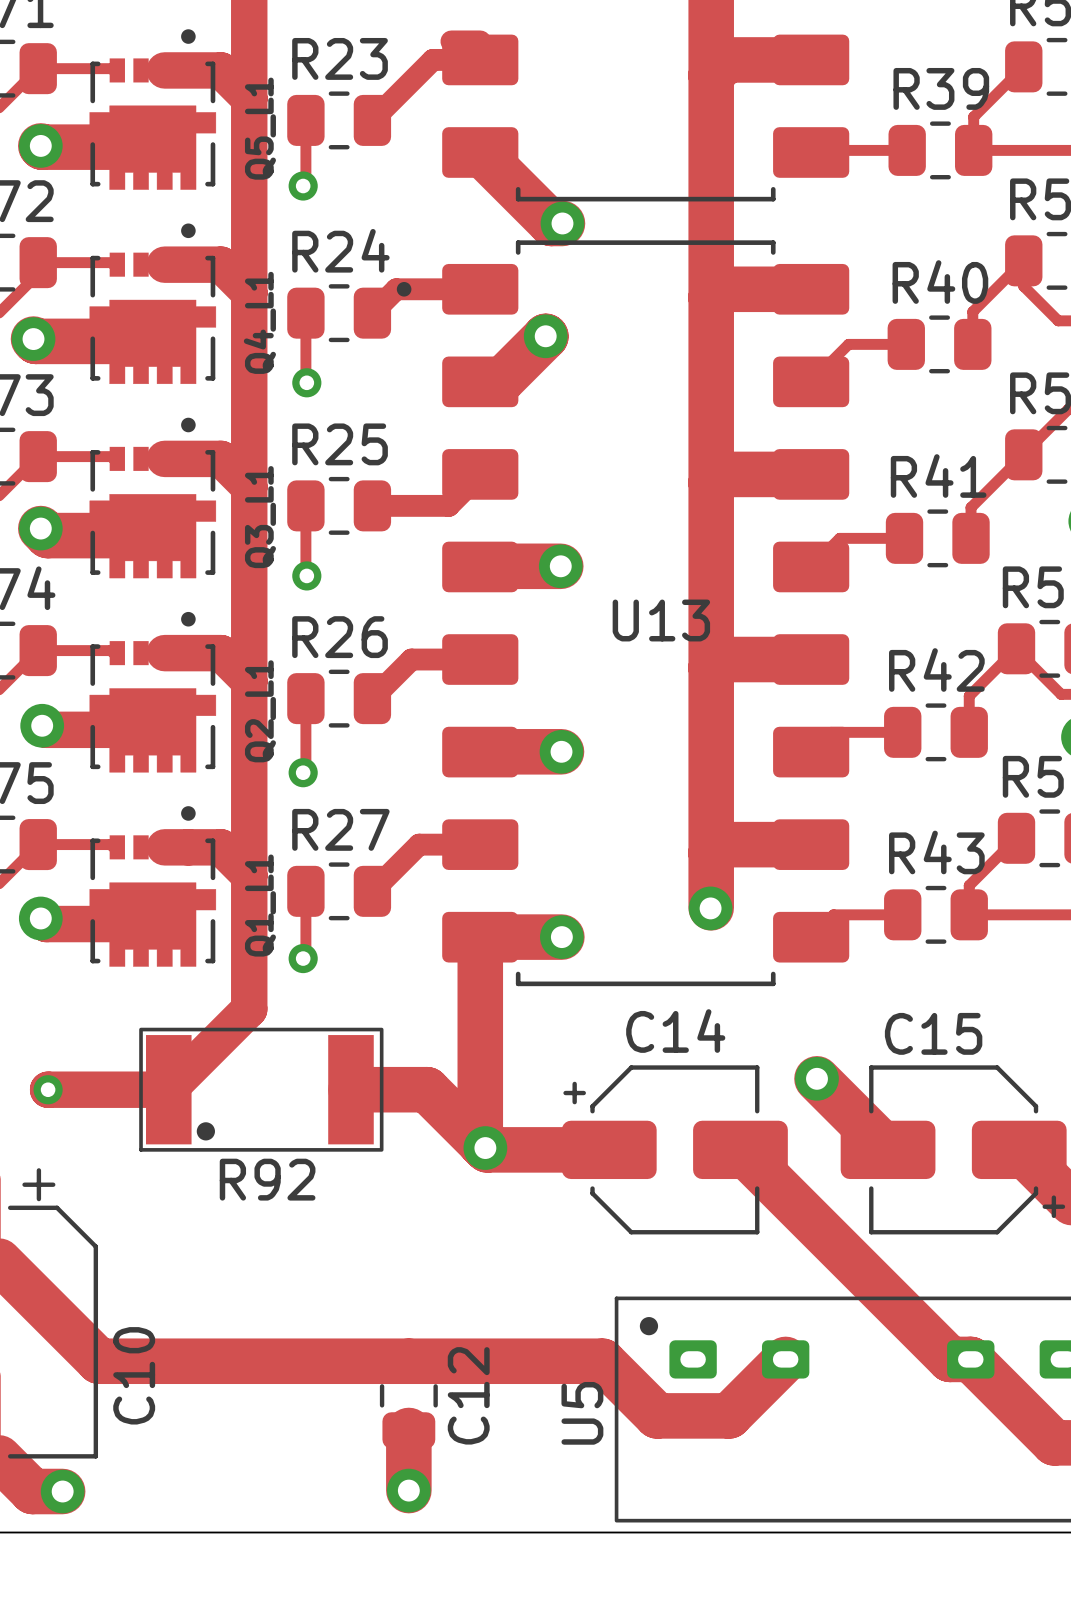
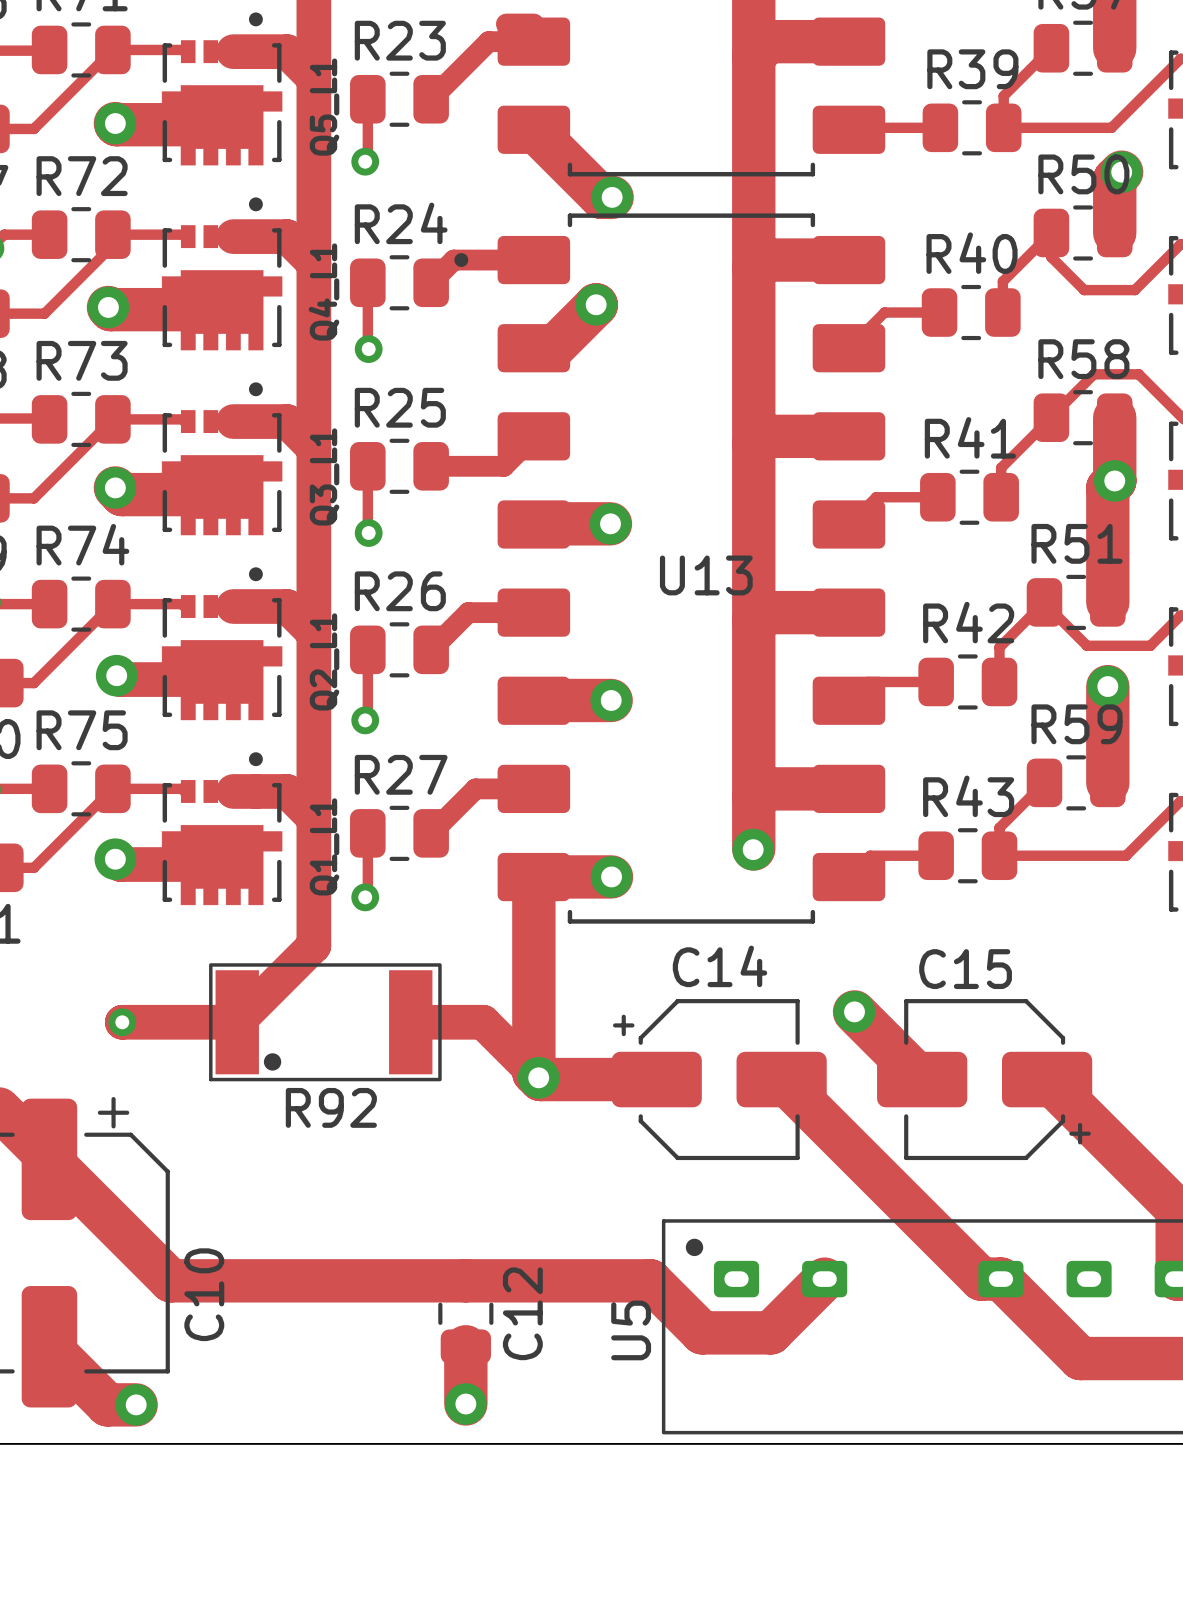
track width: thick (350, 1089) (427, 1089) (480, 1142) -> thin (410, 1022) (483, 1022) (533, 1072)

